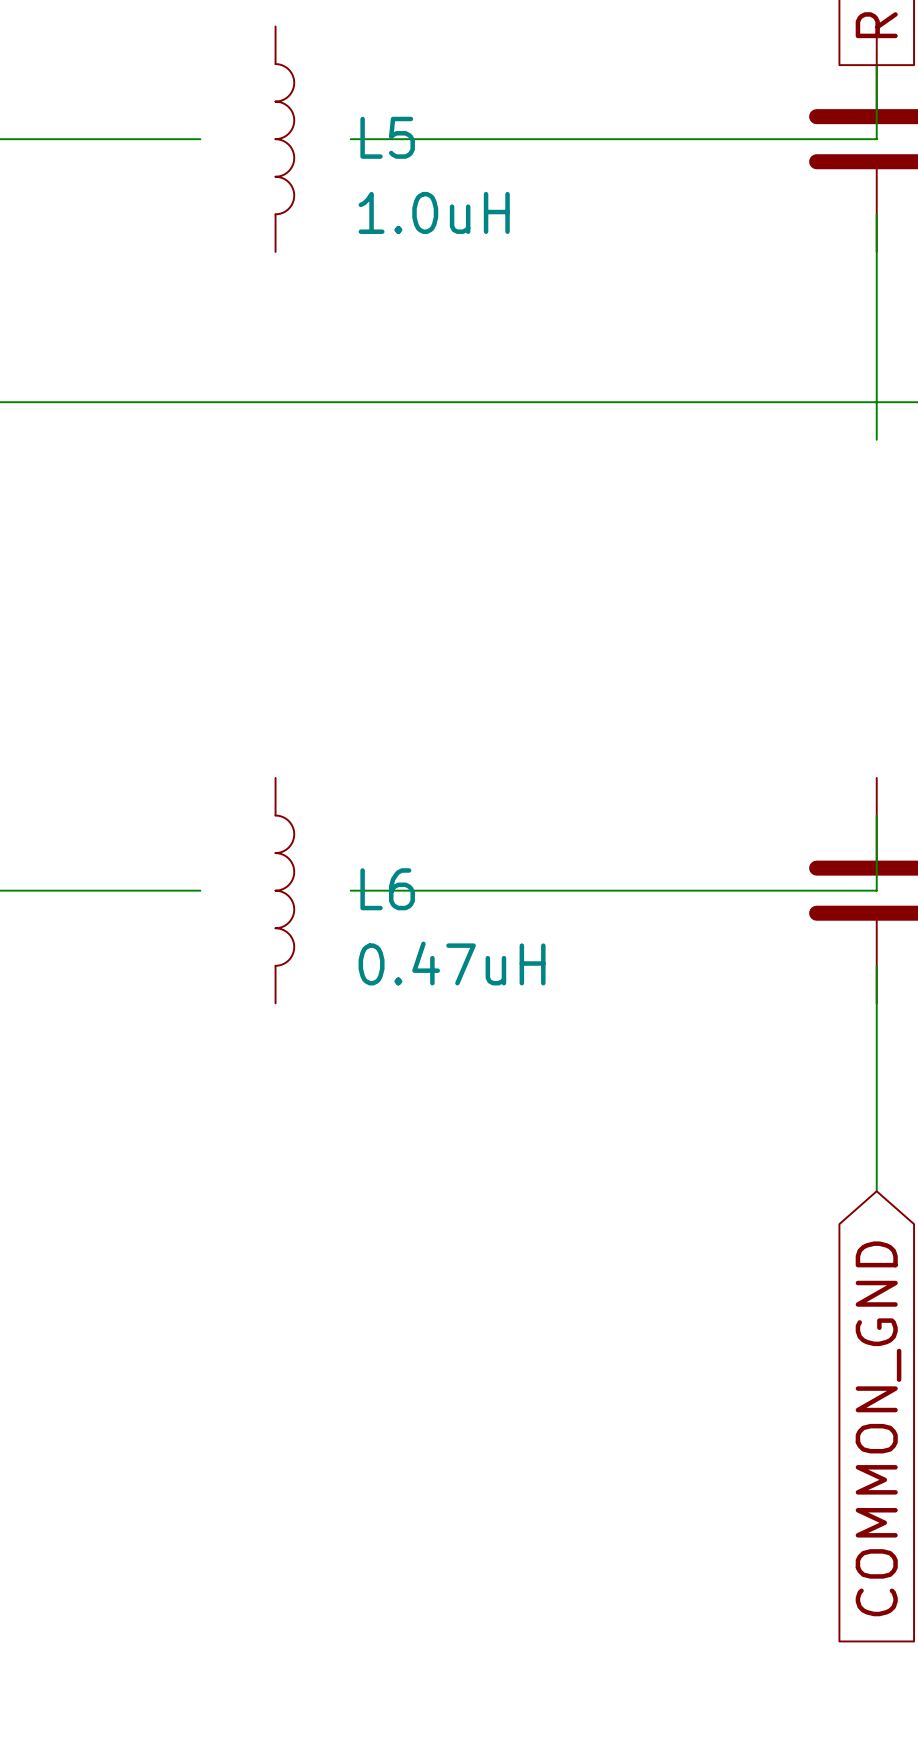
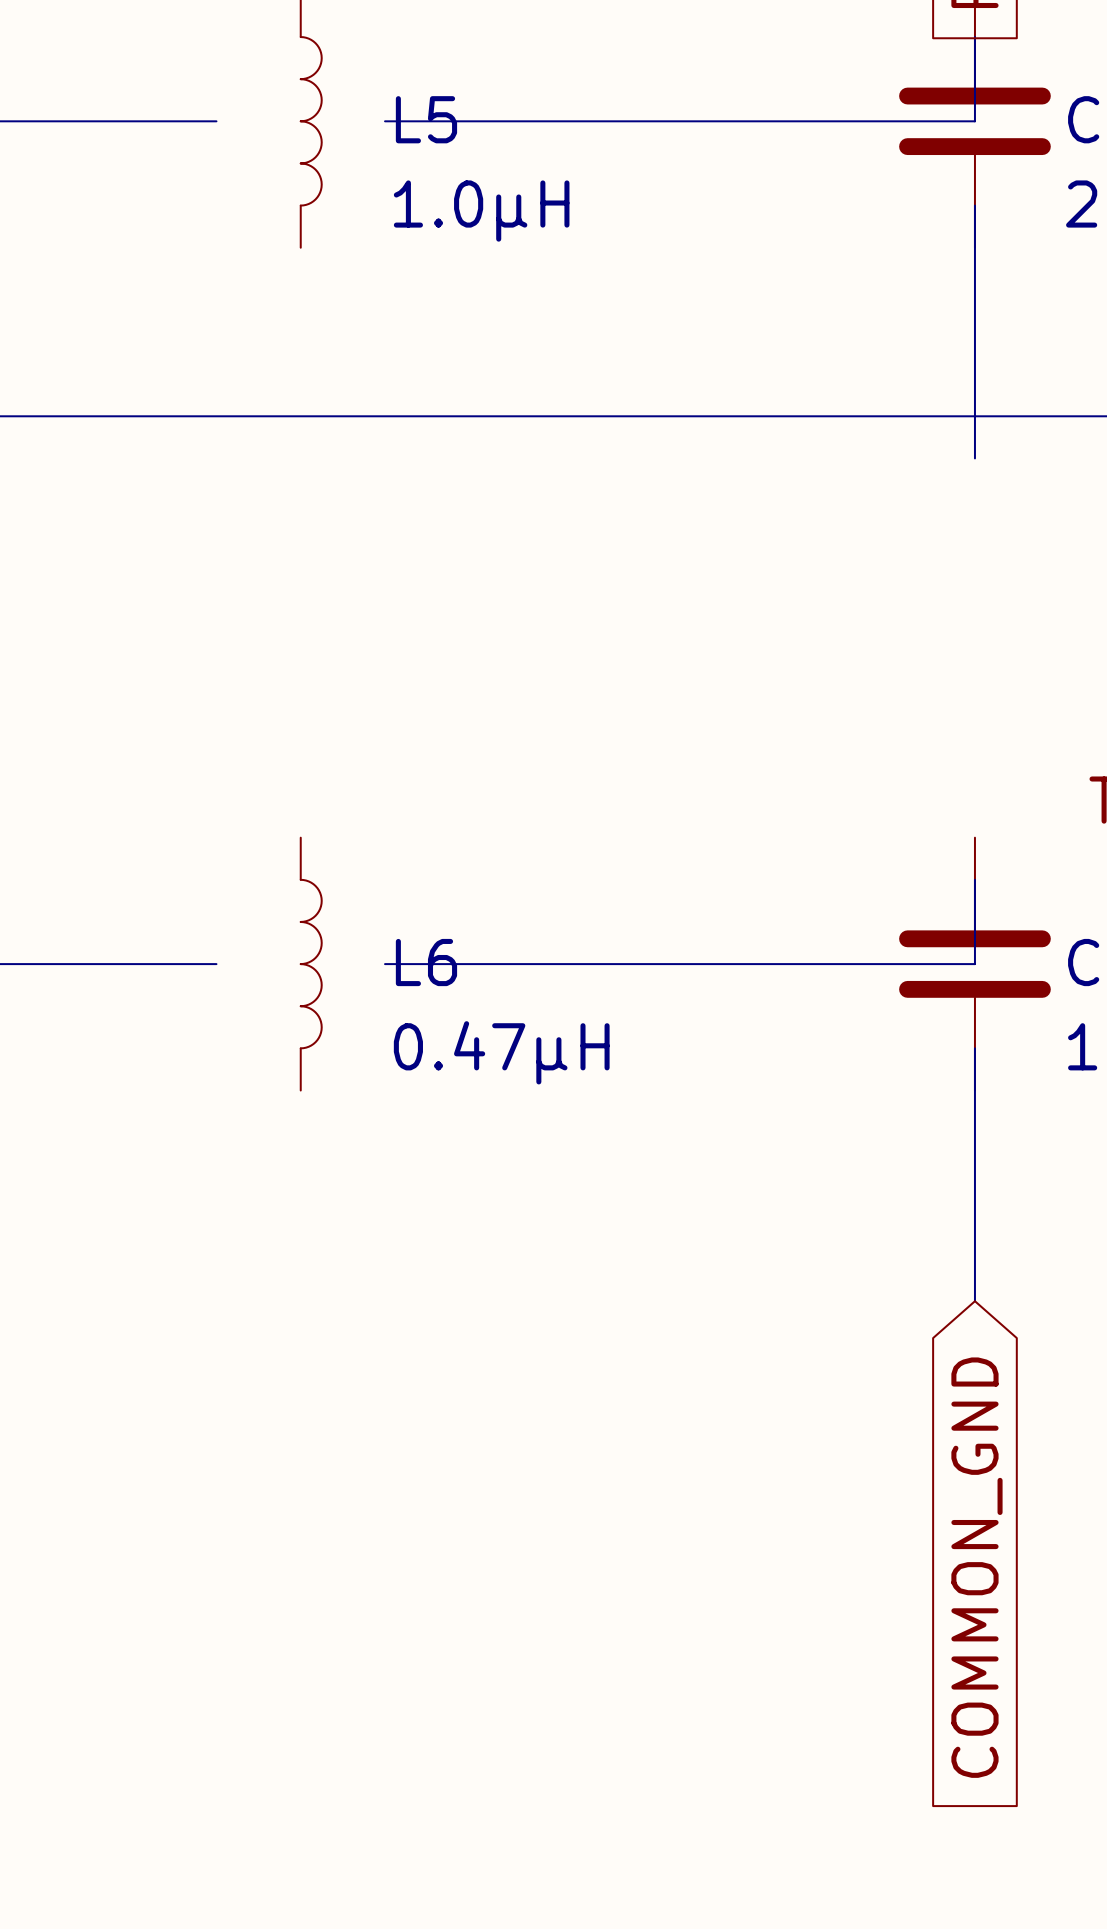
L5 value: 1.0uH (434, 212) -> 1.0µH (481, 211)
L6 value: 0.47uH (452, 963) -> 0.47µH (501, 1052)

